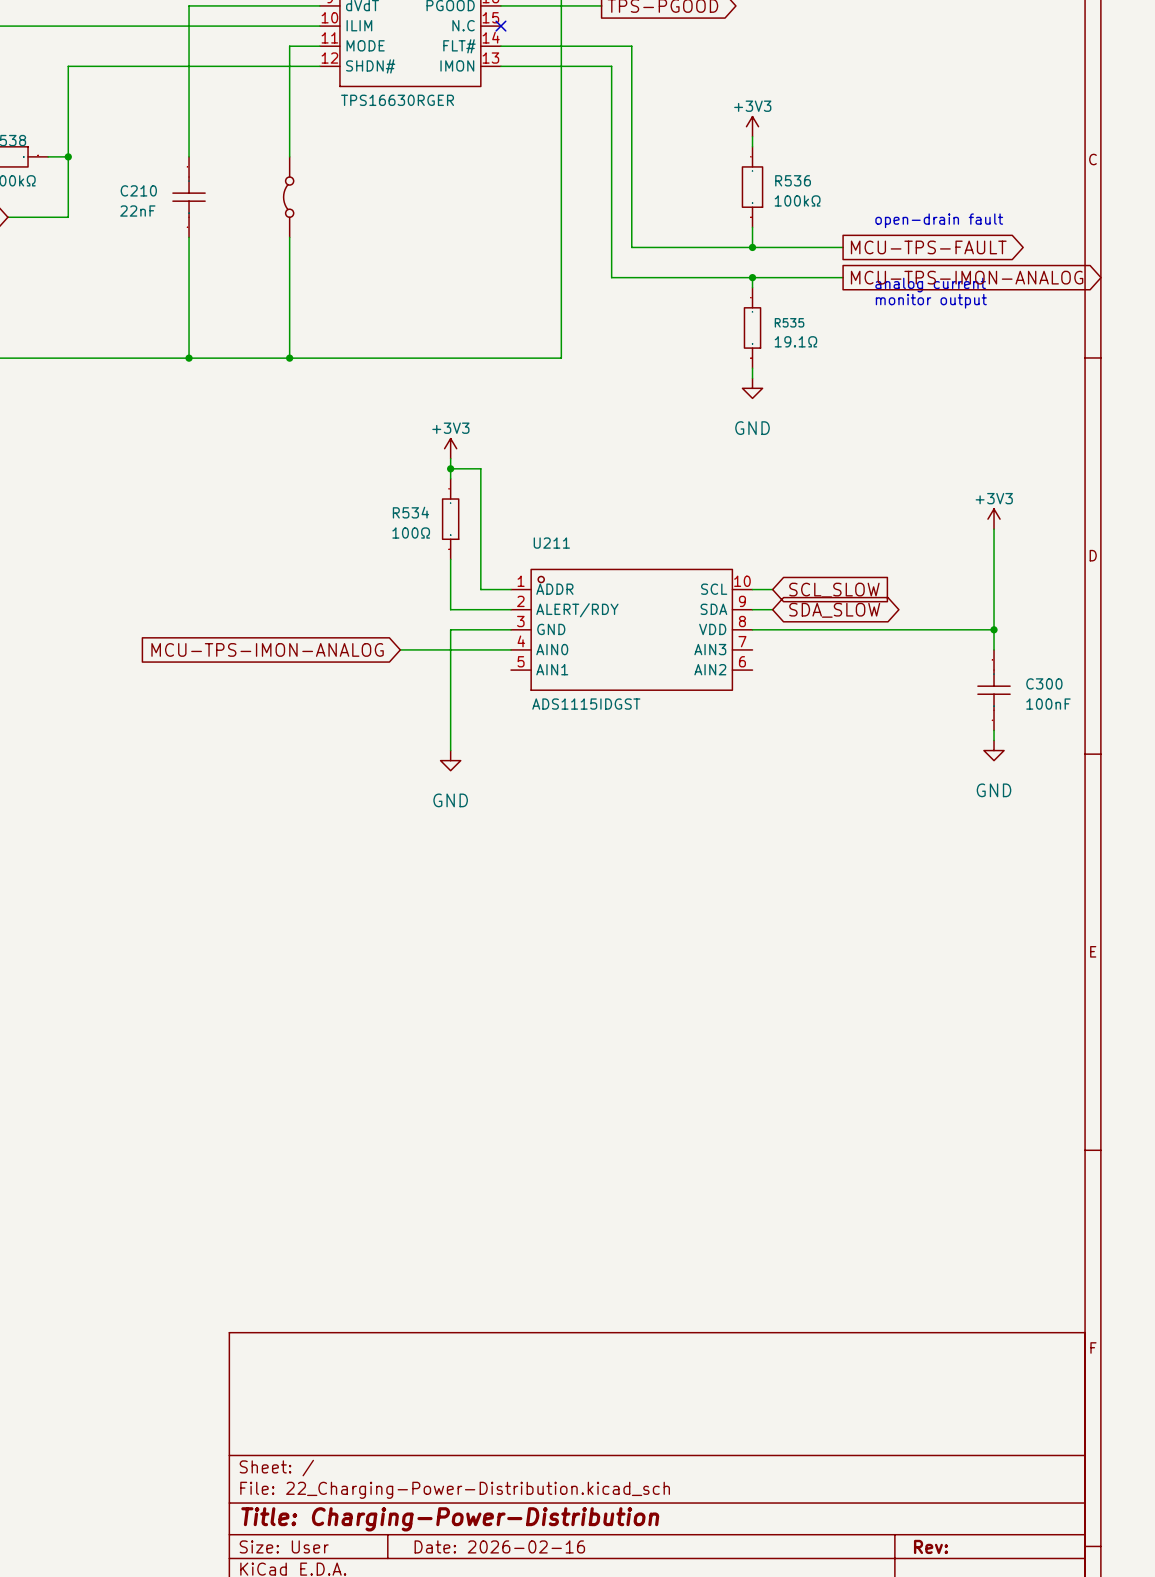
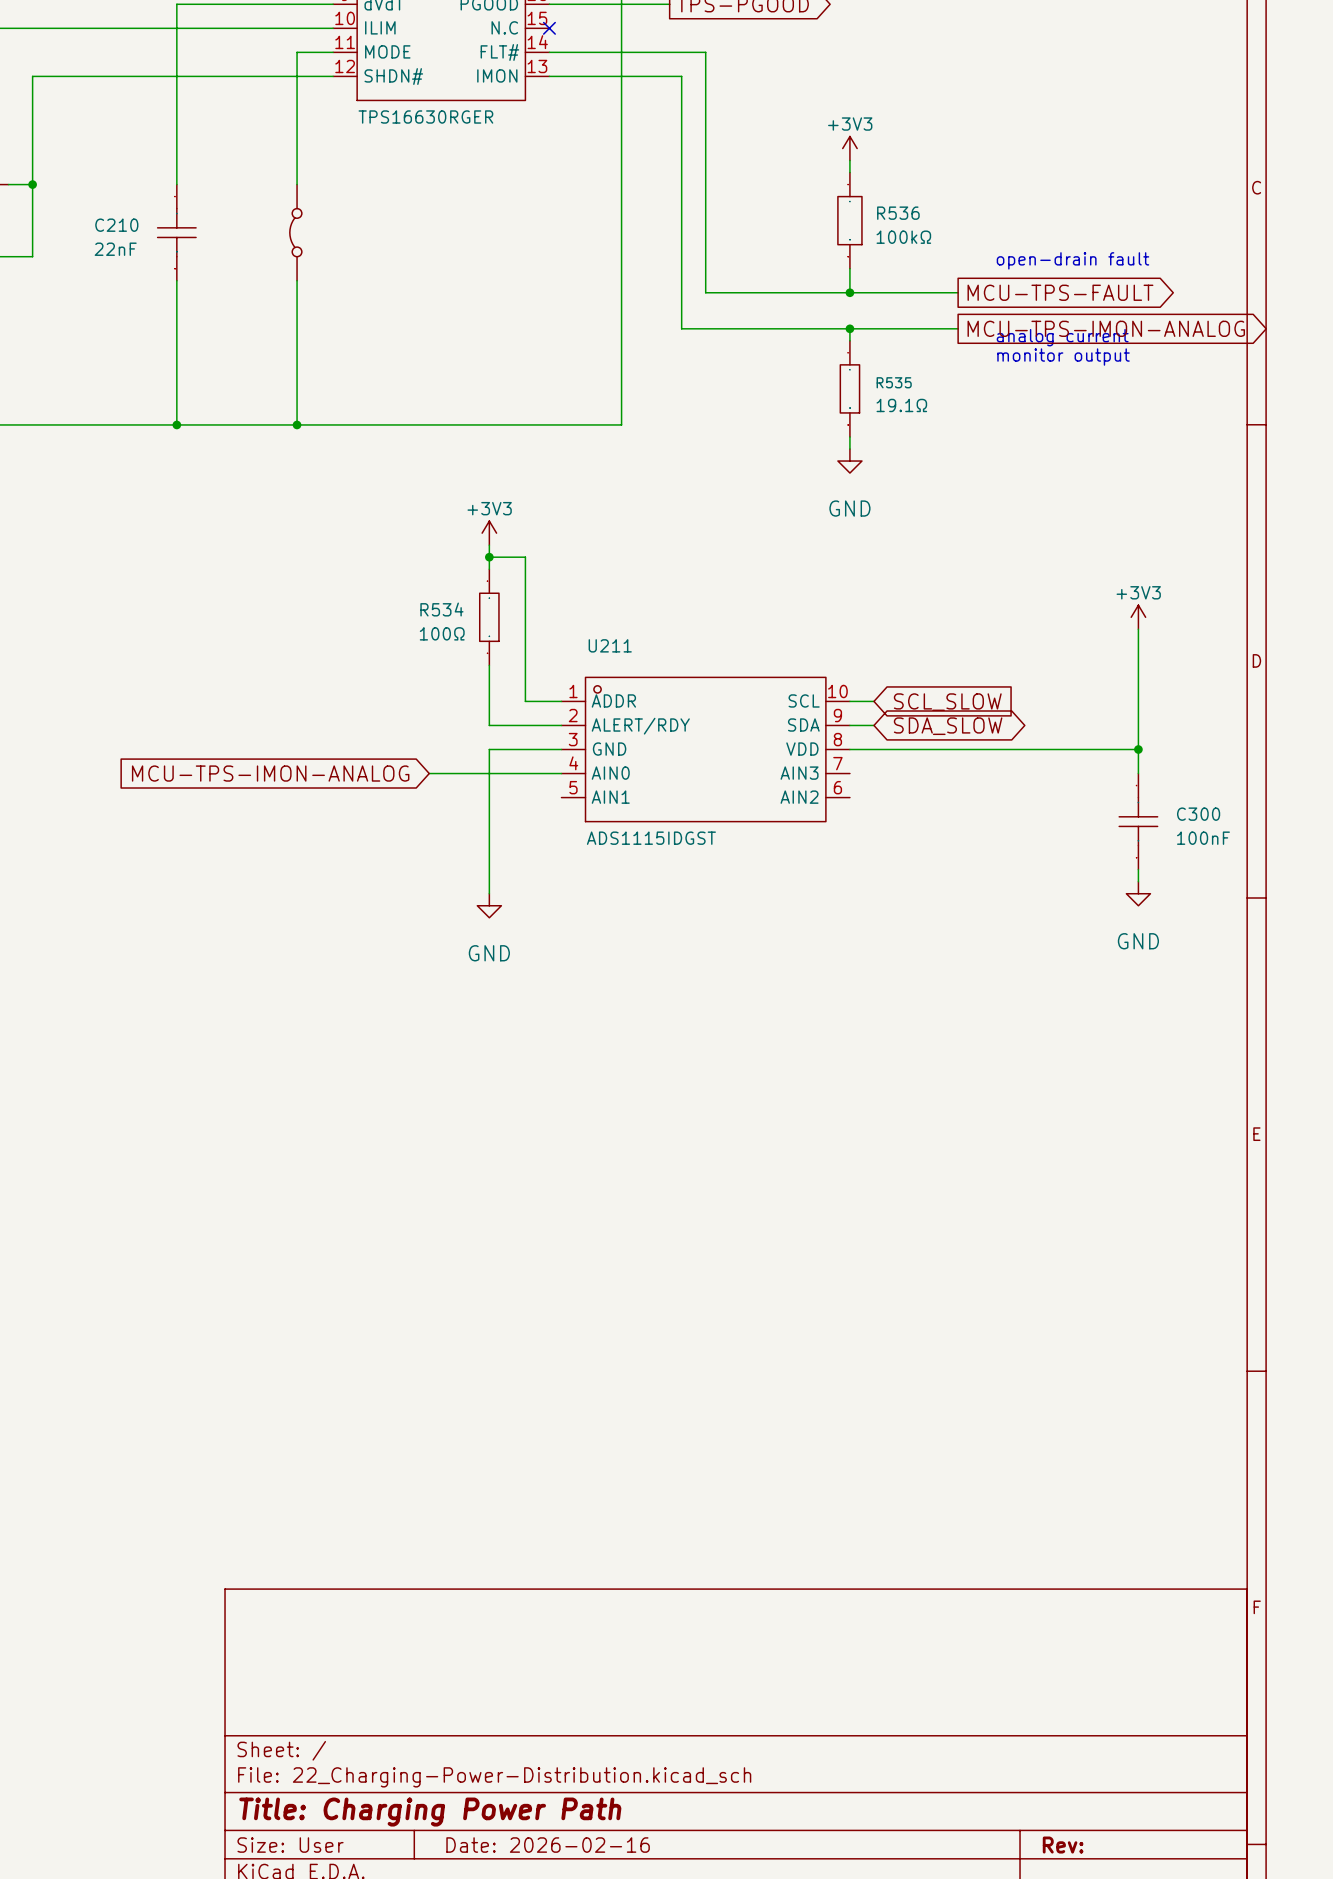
title block: Title: Charging-Power-Distribution (450, 1519) -> Title: Charging Power Path (430, 1812)

